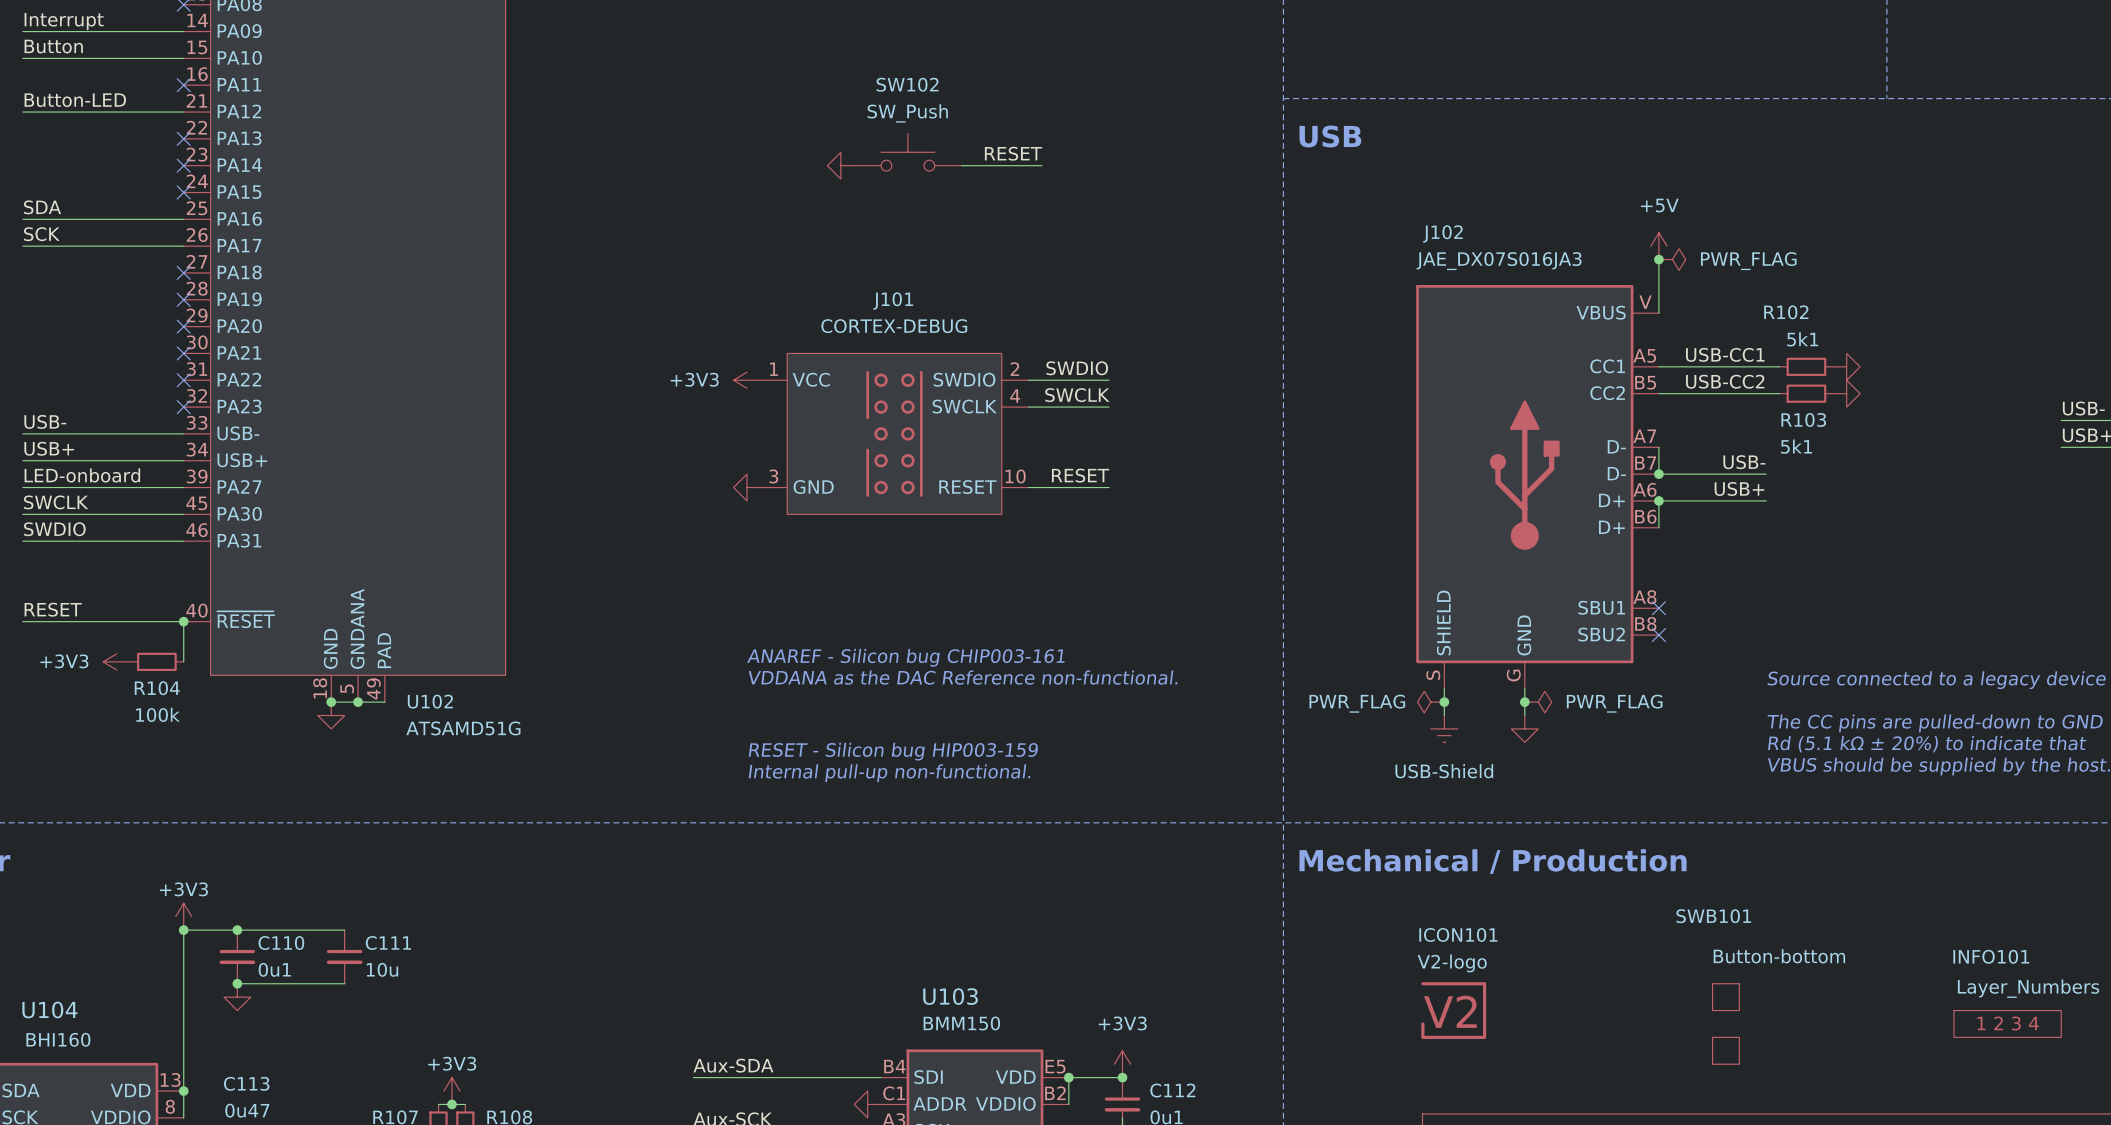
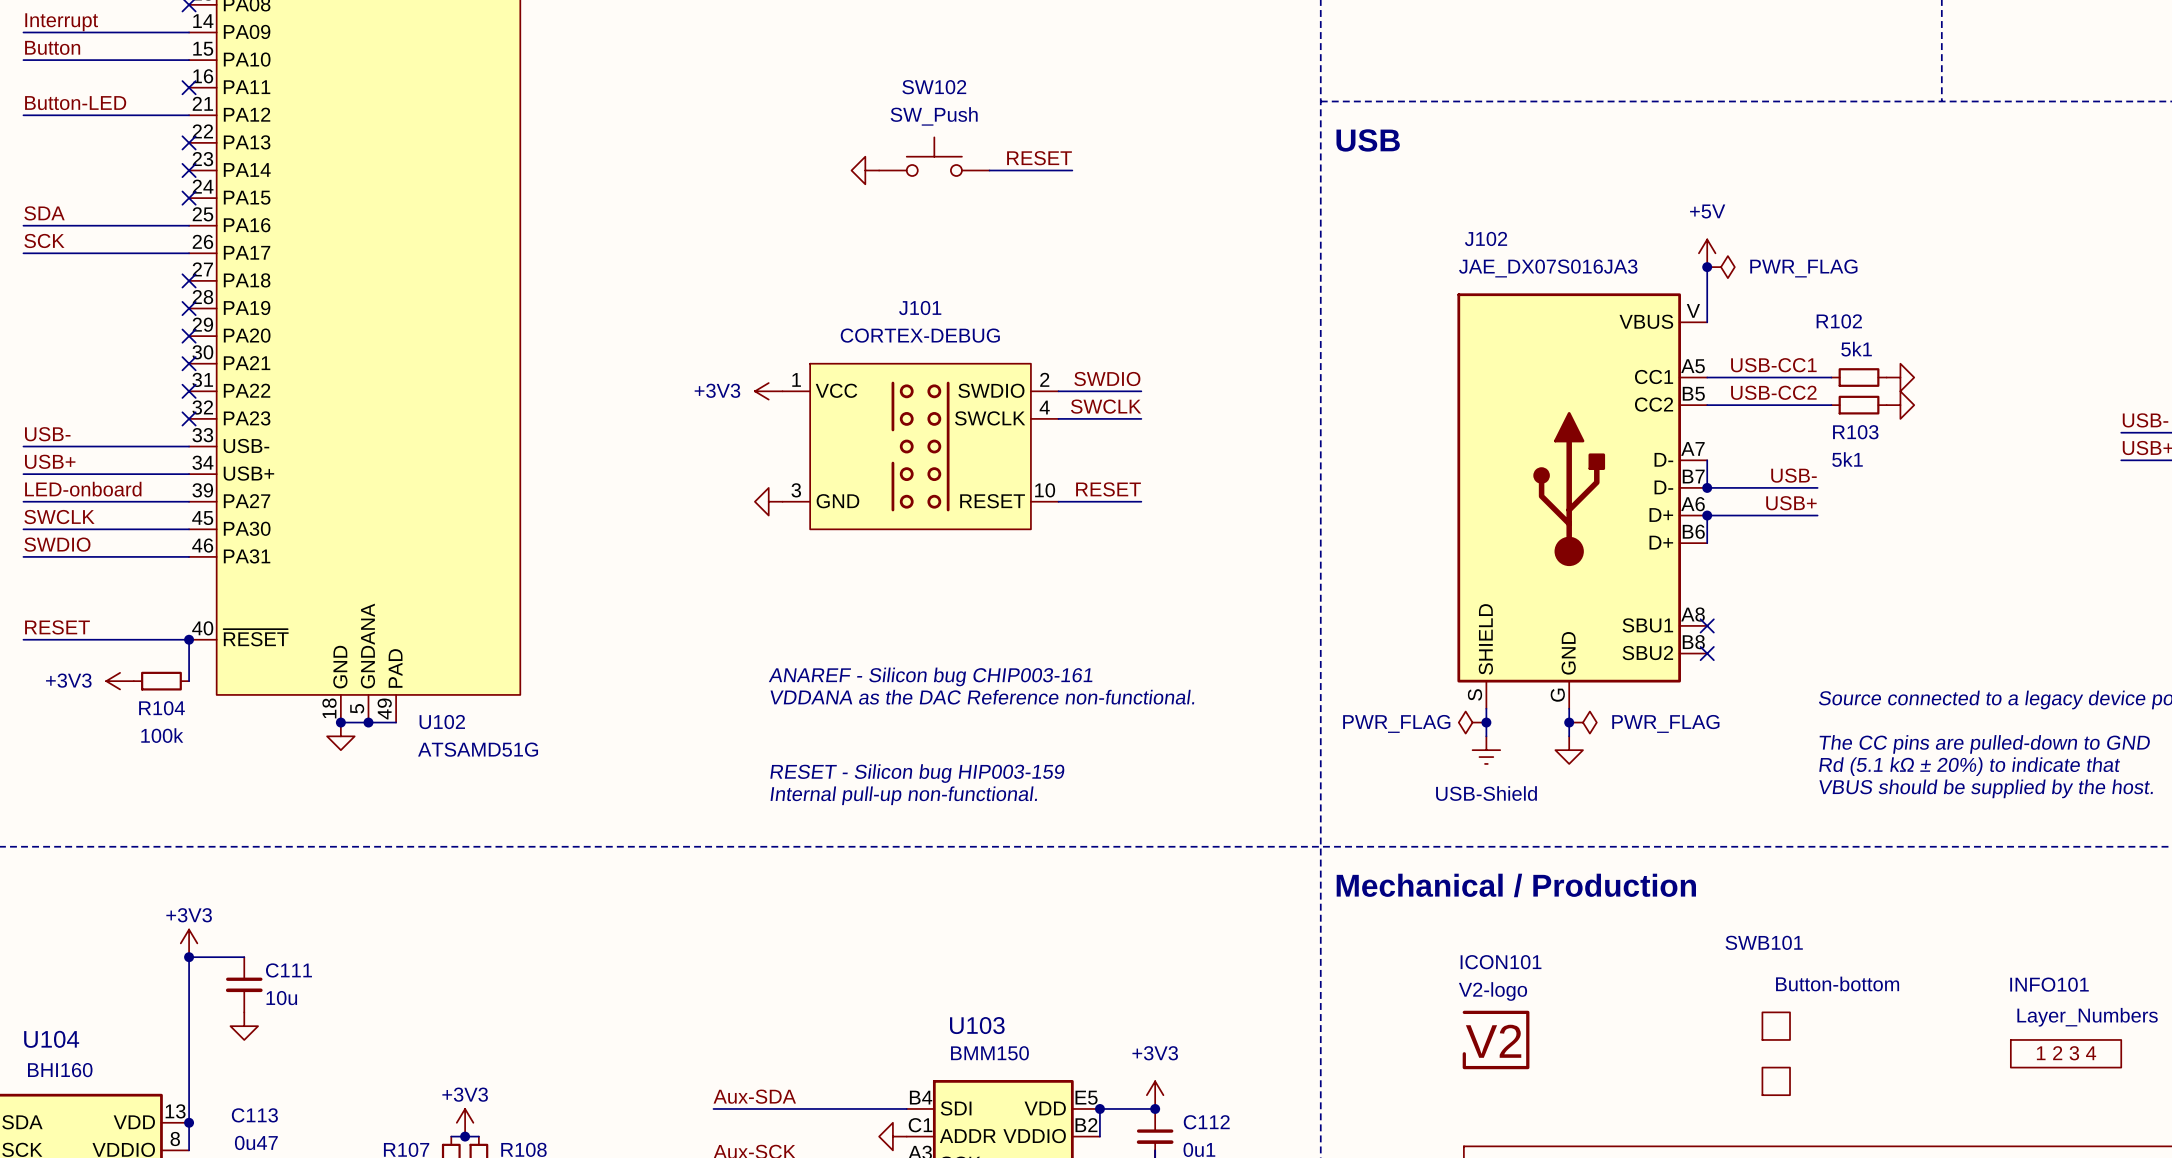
wire: (237, 930) (344, 930) -> none
junction: (237, 930) -> none
C110 name: C110 (281, 943) -> C111 (288, 970)
C111: 10u (344, 956) -> none
C110 value: 0u1 (274, 969) -> 10u (281, 998)
wire: (237, 983) (344, 983) -> none
junction: (237, 983) -> none

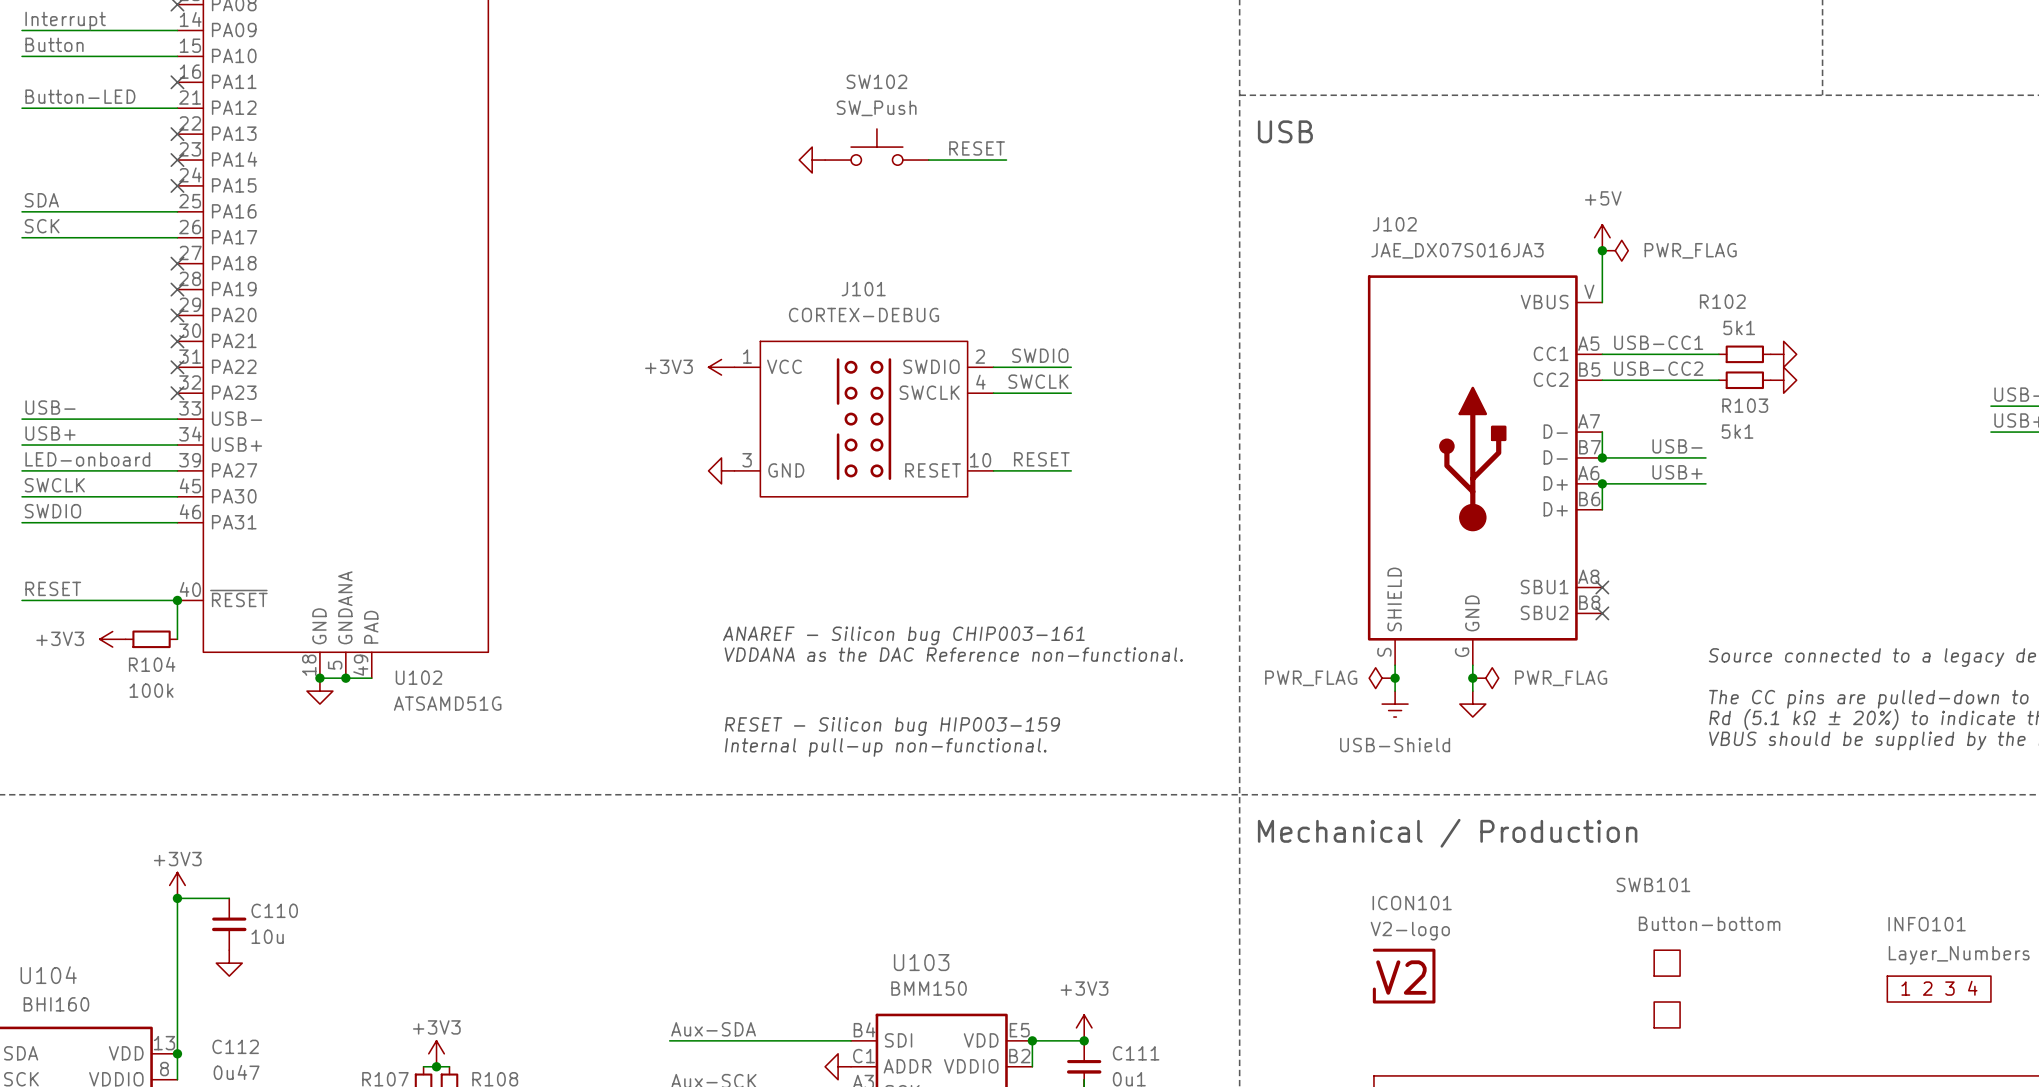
C111 name: C111 (288, 970) -> C110 (274, 910)
C113 name: C113 (254, 1115) -> C112 (235, 1046)
C112 name: C112 (1206, 1122) -> C111 (1136, 1053)

